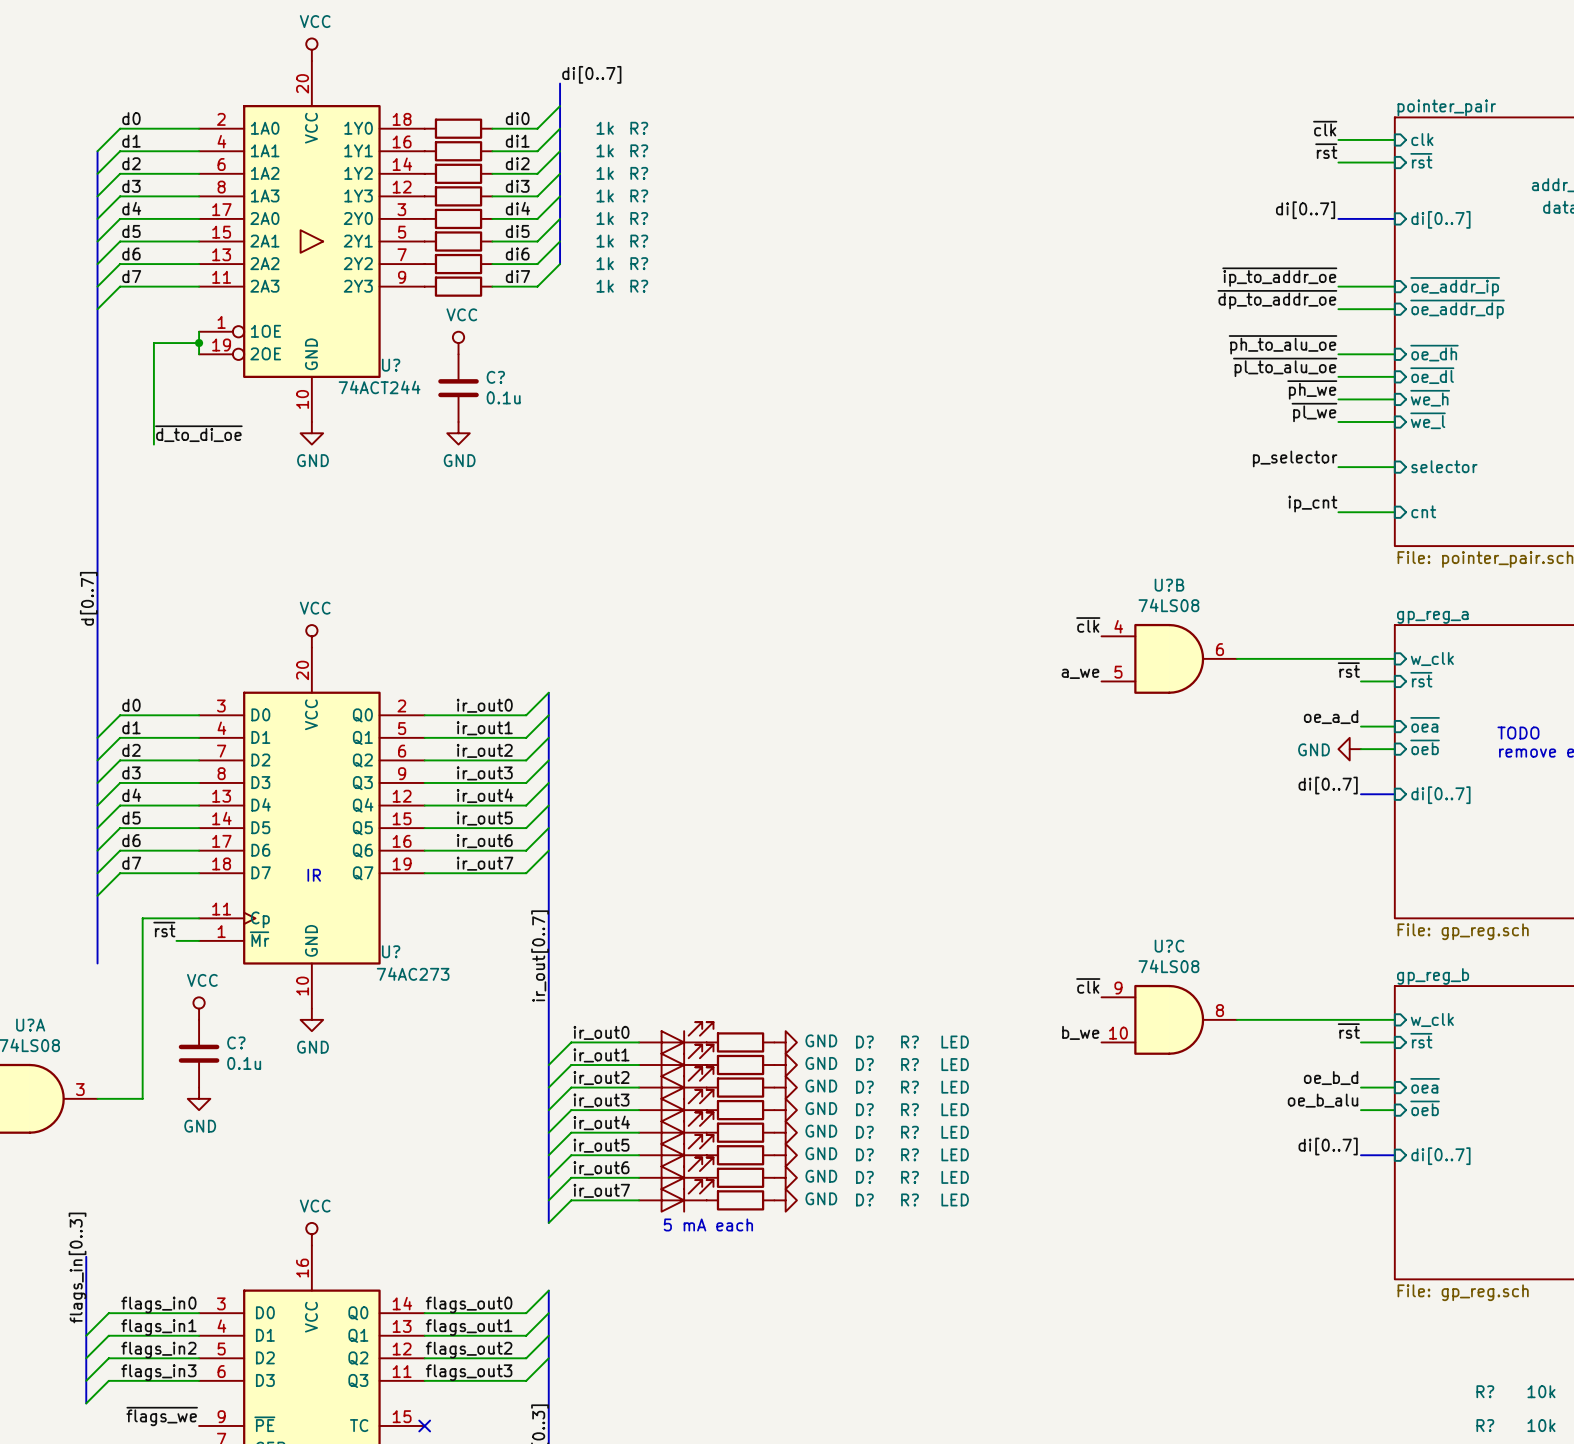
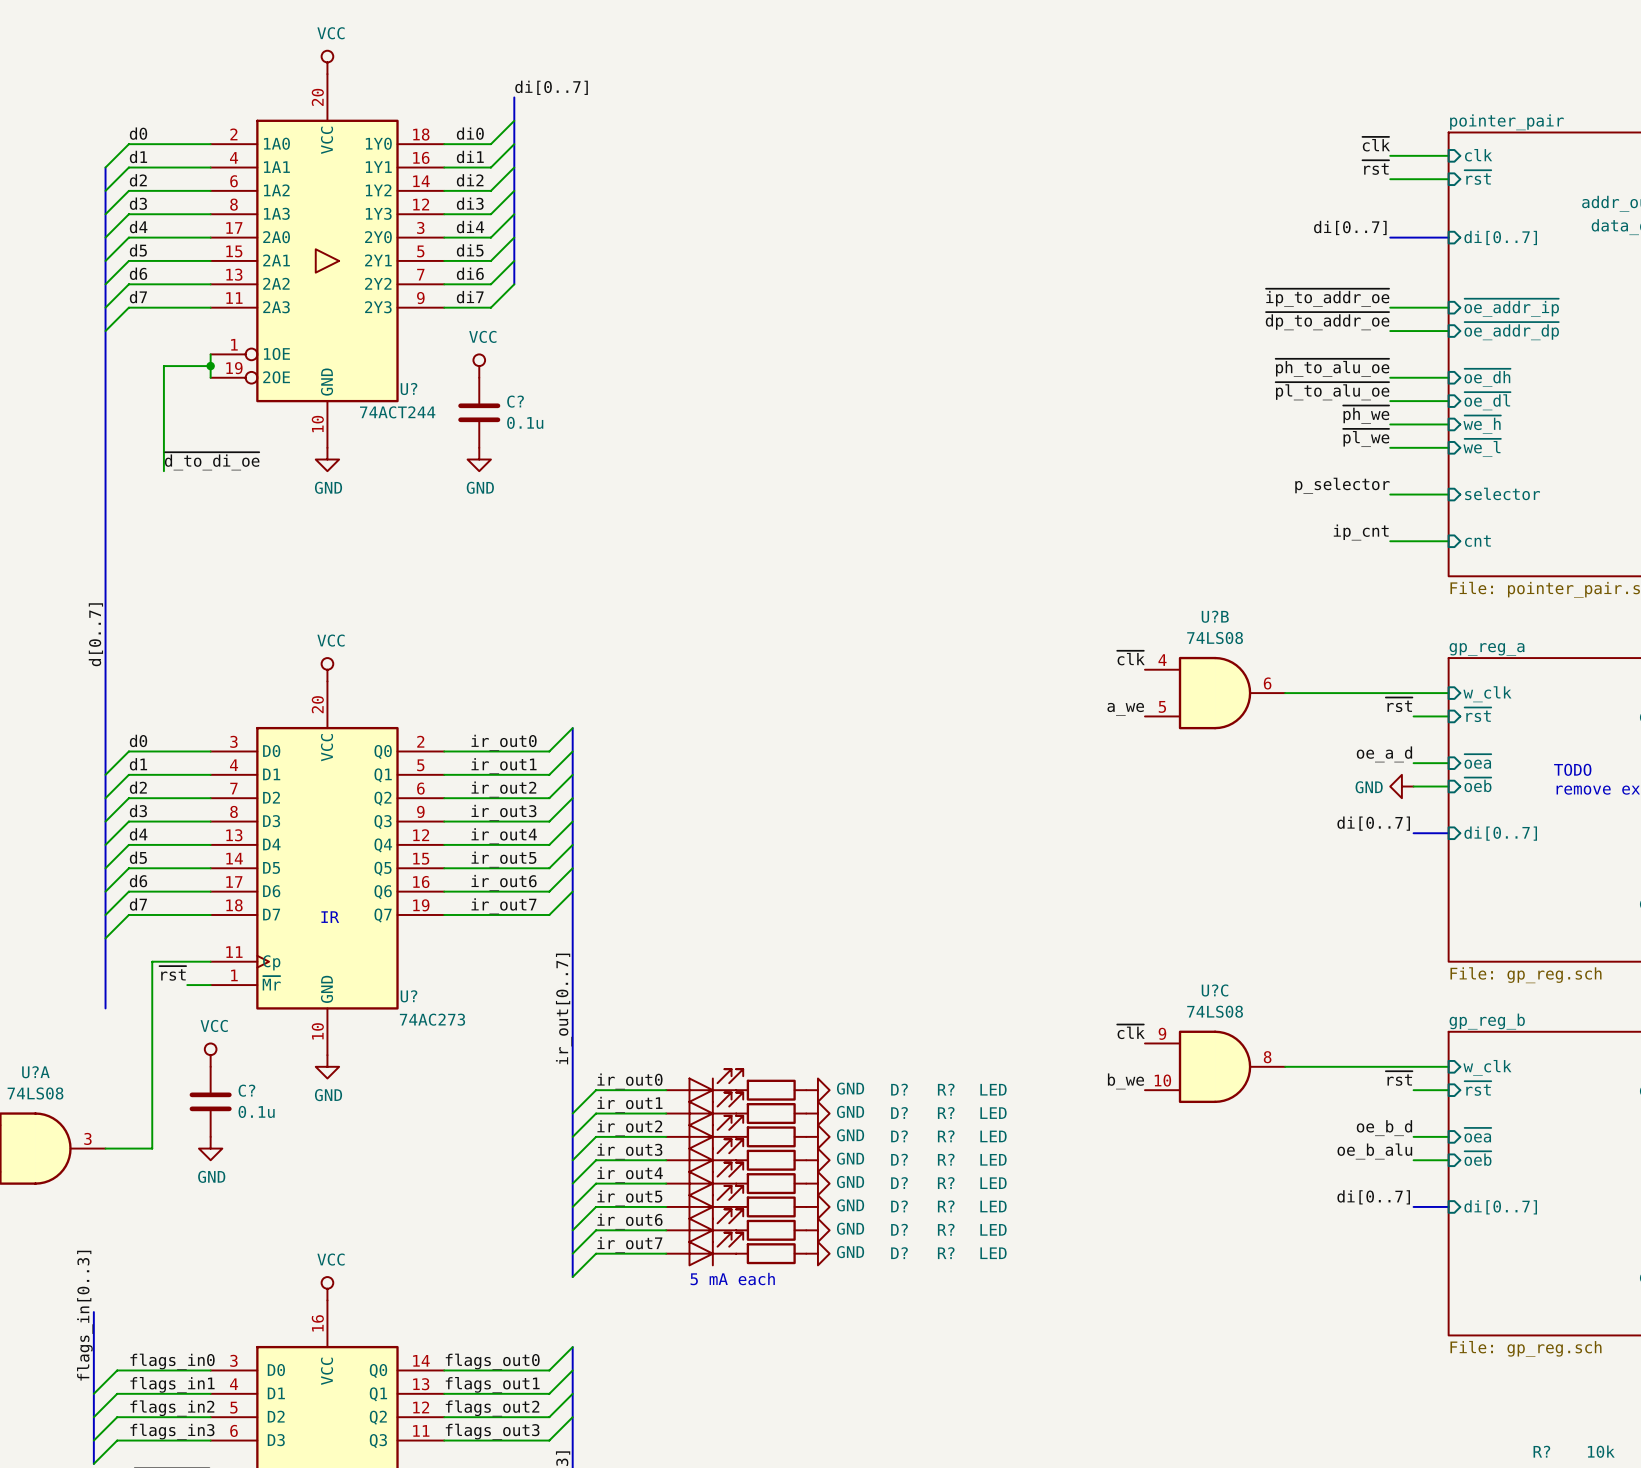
label position: di[0..7] (591, 74) -> di[0..7] (551, 87)
bus: (560, 83) (560, 264) -> (514, 97) (514, 284)
wire: (560, 106) (537, 128) (492, 128) -> (444, 167) (490, 167) (514, 144)
label position: di0 (517, 118) -> di0 (470, 133)
R?: 1k (458, 128) -> none
wire: (560, 128) (537, 151) (492, 151) -> (444, 190) (490, 190) (514, 167)
label position: di1 (517, 141) -> di1 (470, 156)
R?: 1k (458, 151) -> none
wire: (560, 151) (537, 173) (492, 173) -> (444, 214) (490, 214) (514, 190)
label position: di2 (517, 163) -> di2 (470, 180)
R?: 1k (458, 173) -> none
wire: (560, 173) (537, 196) (492, 196) -> (444, 237) (490, 237) (514, 214)
label position: di3 (517, 186) -> di3 (470, 203)
R?: 1k (458, 196) -> none
wire: (560, 196) (537, 218) (492, 218) -> (444, 260) (490, 260) (514, 237)
label position: di4 (517, 208) -> di4 (470, 227)
R?: 1k (458, 218) -> none
wire: (560, 218) (537, 241) (492, 241) -> (444, 284) (490, 284) (514, 260)
label position: di5 (517, 231) -> di5 (470, 250)
R?: 1k (458, 241) -> none
wire: (560, 241) (537, 264) (492, 264) -> (444, 307) (490, 307) (514, 284)
label position: di6 (517, 254) -> di6 (470, 273)
R?: 1k (458, 264) -> none
wire: (560, 264) (537, 286) (492, 286) -> (514, 120) (490, 144) (444, 144)
label position: di7 (517, 276) -> di7 (470, 297)
R?: 1k (458, 286) -> none

